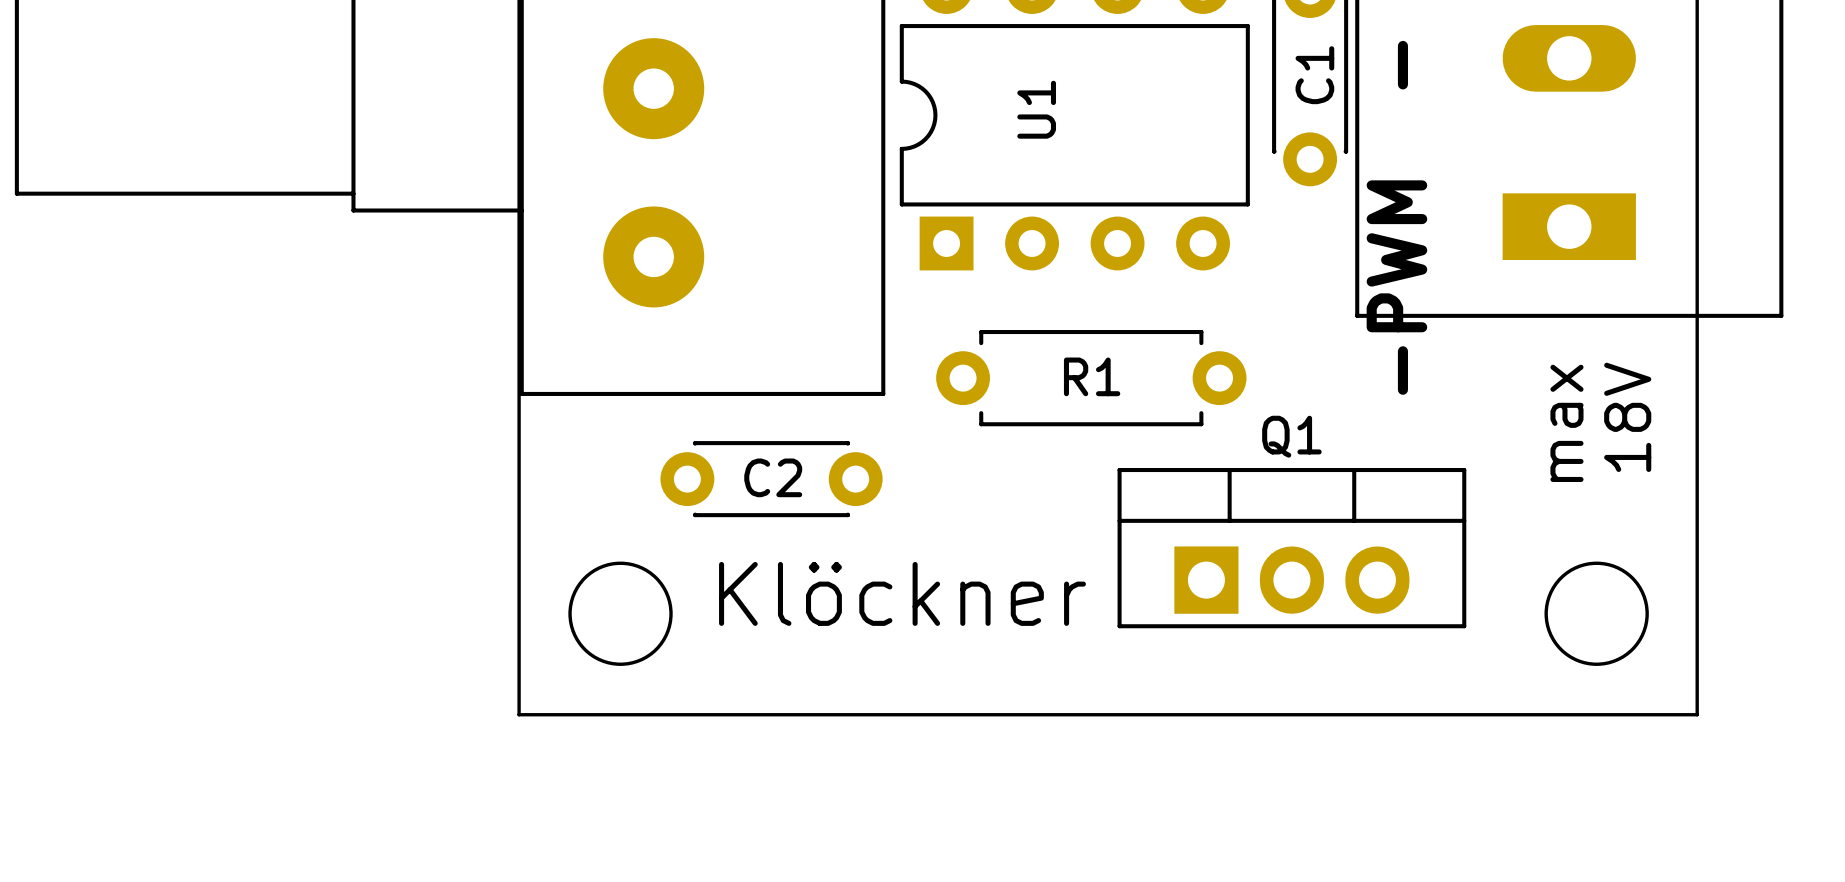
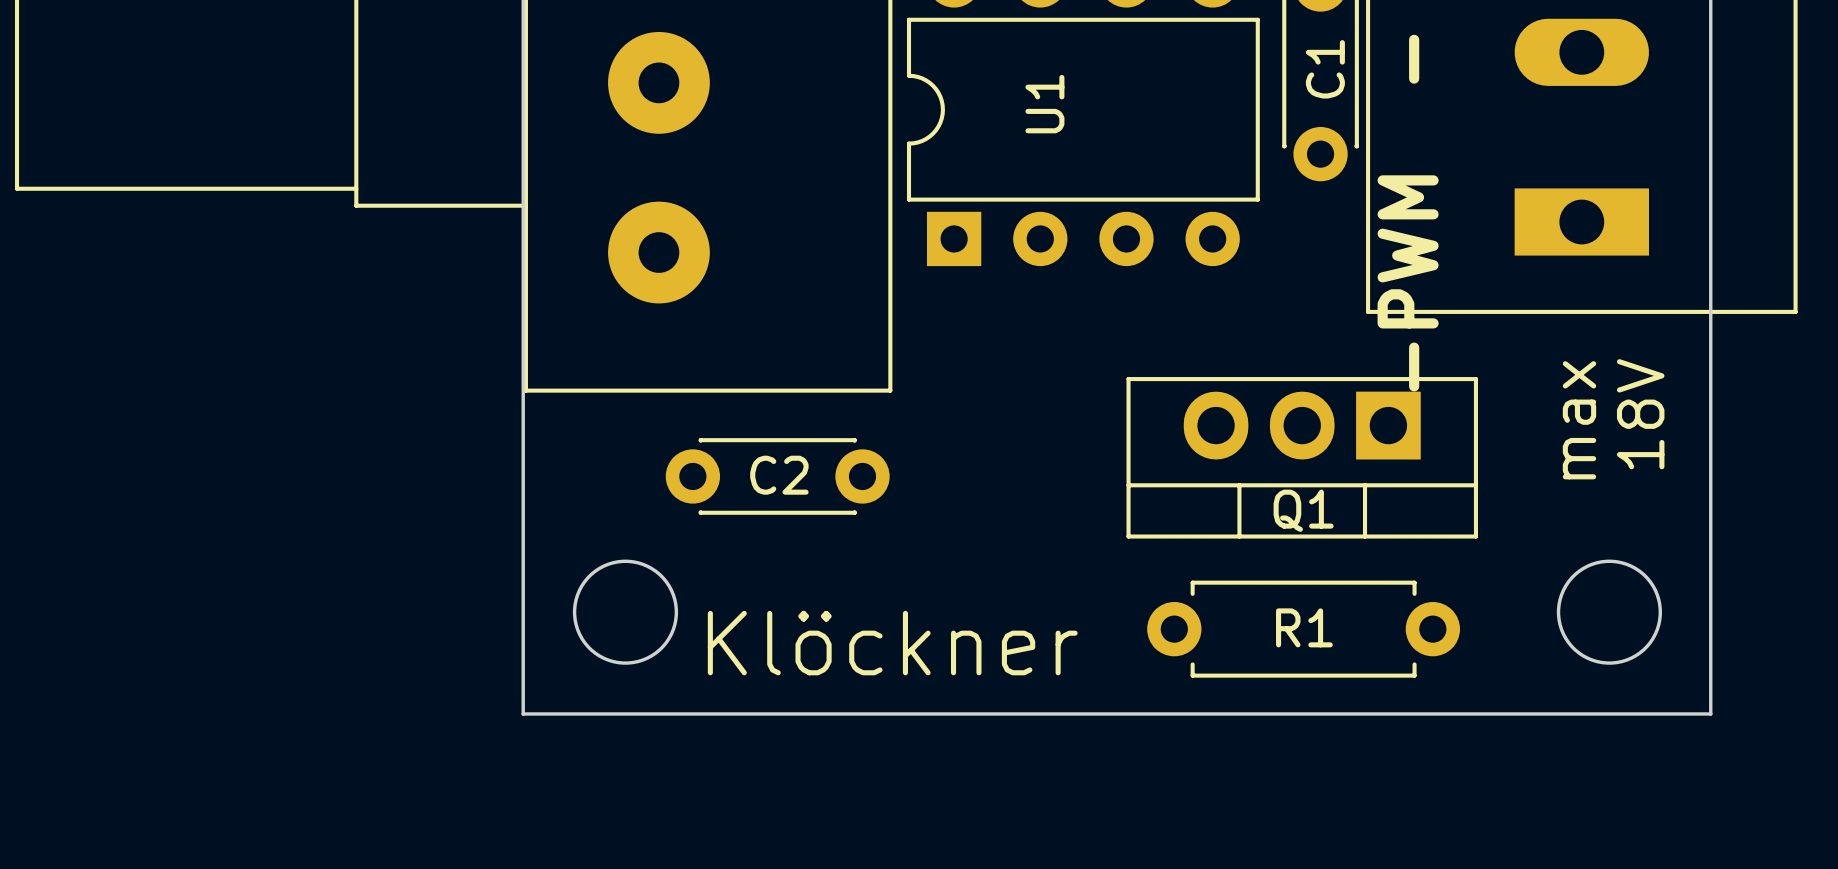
R1 position: (1091, 378) -> (1303, 629)
Q1 rotation: 0° (1291, 548) -> 180° (1302, 457)
text position: Klöckner (902, 593) -> Klöckner (892, 643)

